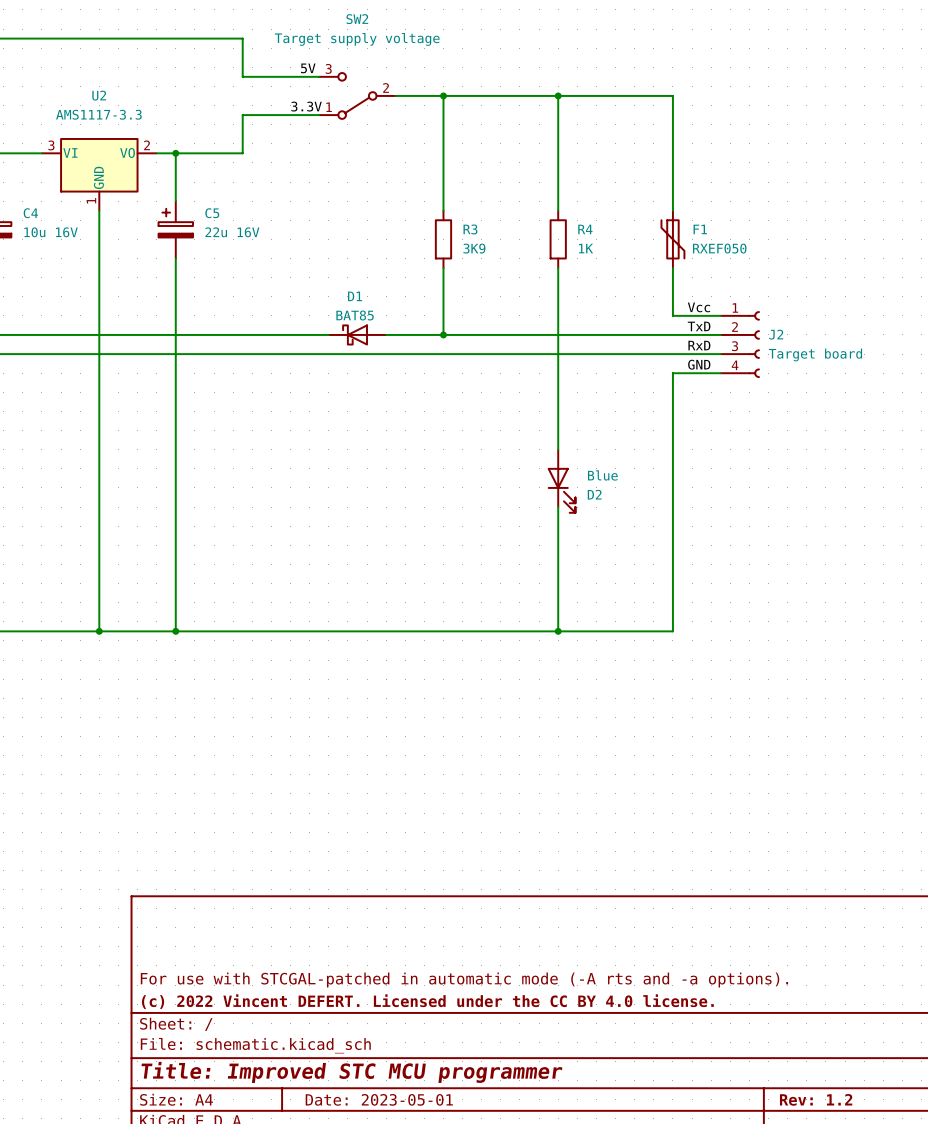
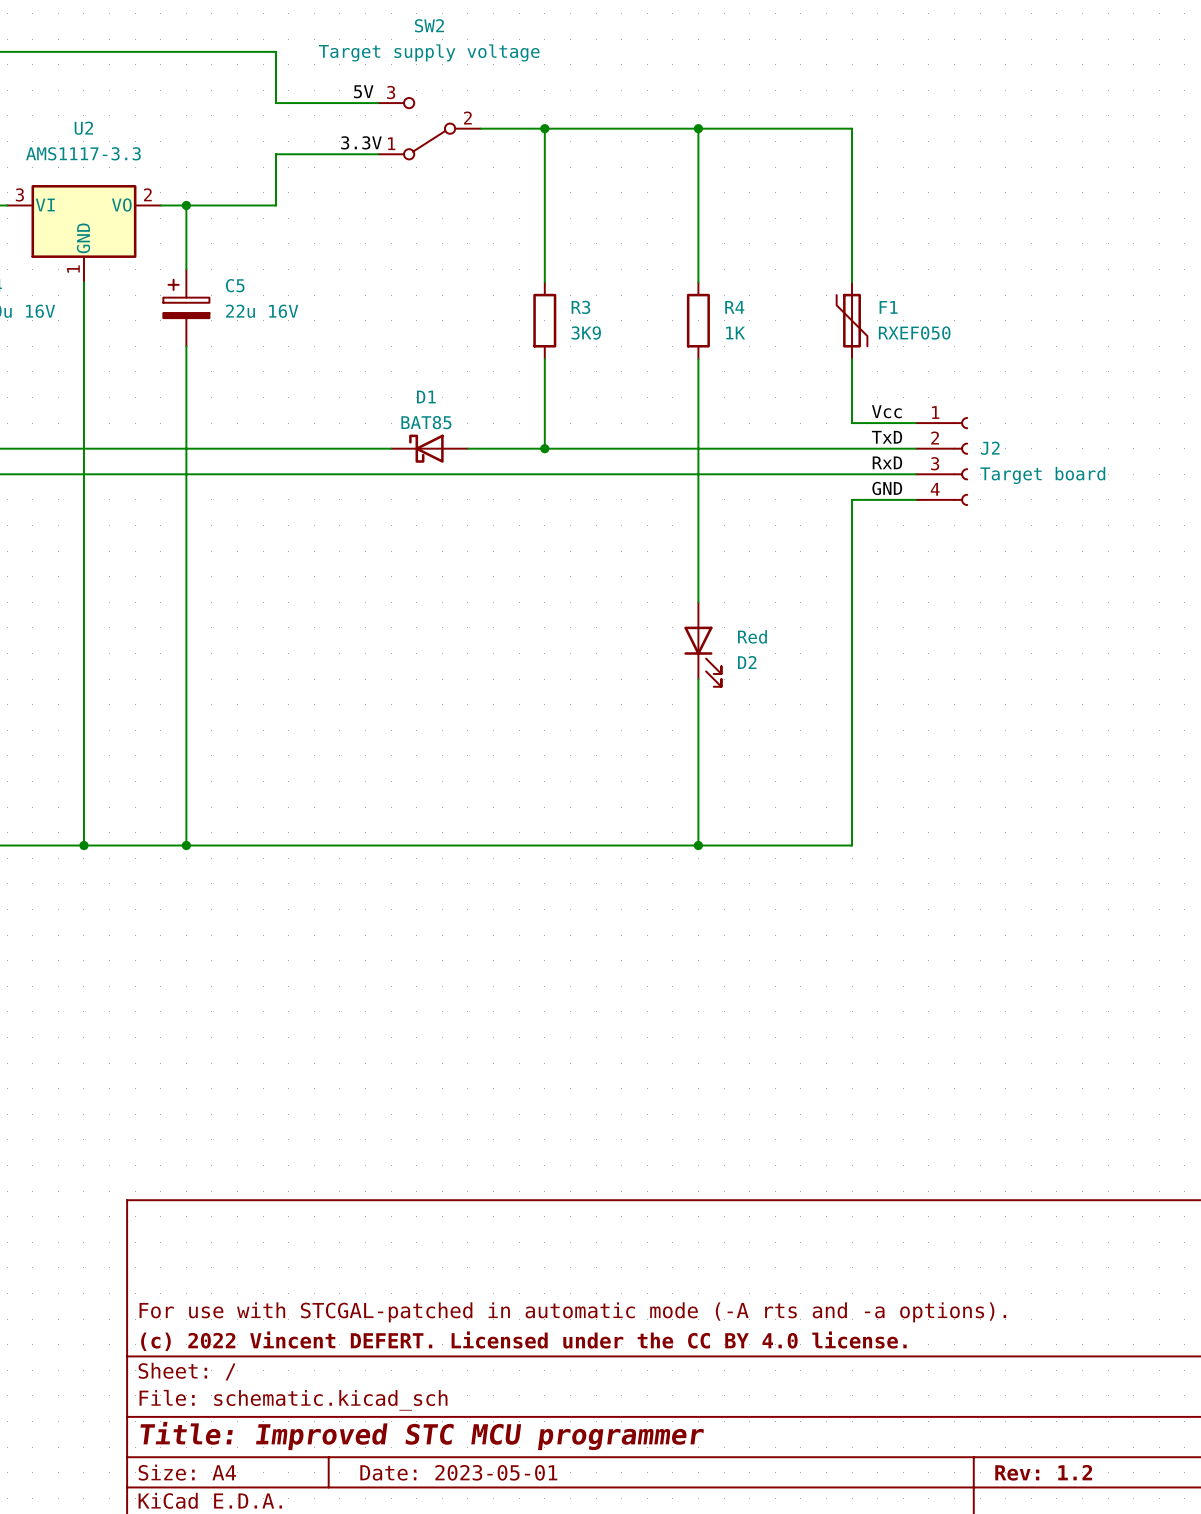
D2 value: Blue (602, 475) -> Red (752, 636)

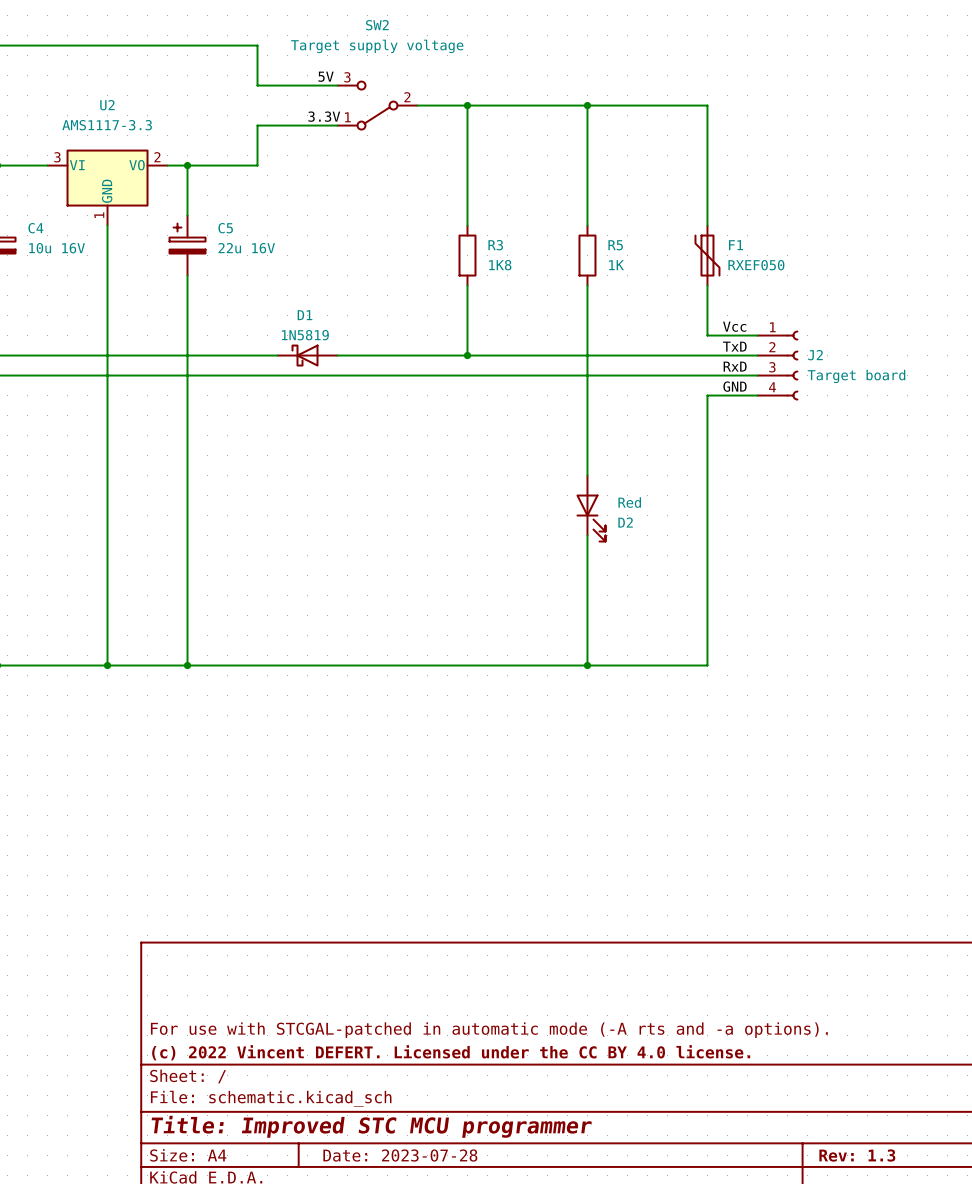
R4 name: R4 (734, 307) -> R5 (615, 245)
R3 value: 3K9 (586, 333) -> 1K8 (500, 265)
D1 value: BAT85 (426, 422) -> 1N5819 (305, 335)
D1 position: (429, 448) -> (307, 355)
title block: Date: 2023-05-01 (458, 1472) -> Date: 2023-07-28 (400, 1155)
title block: Rev: 1.2 (1043, 1472) -> Rev: 1.3 (857, 1155)

